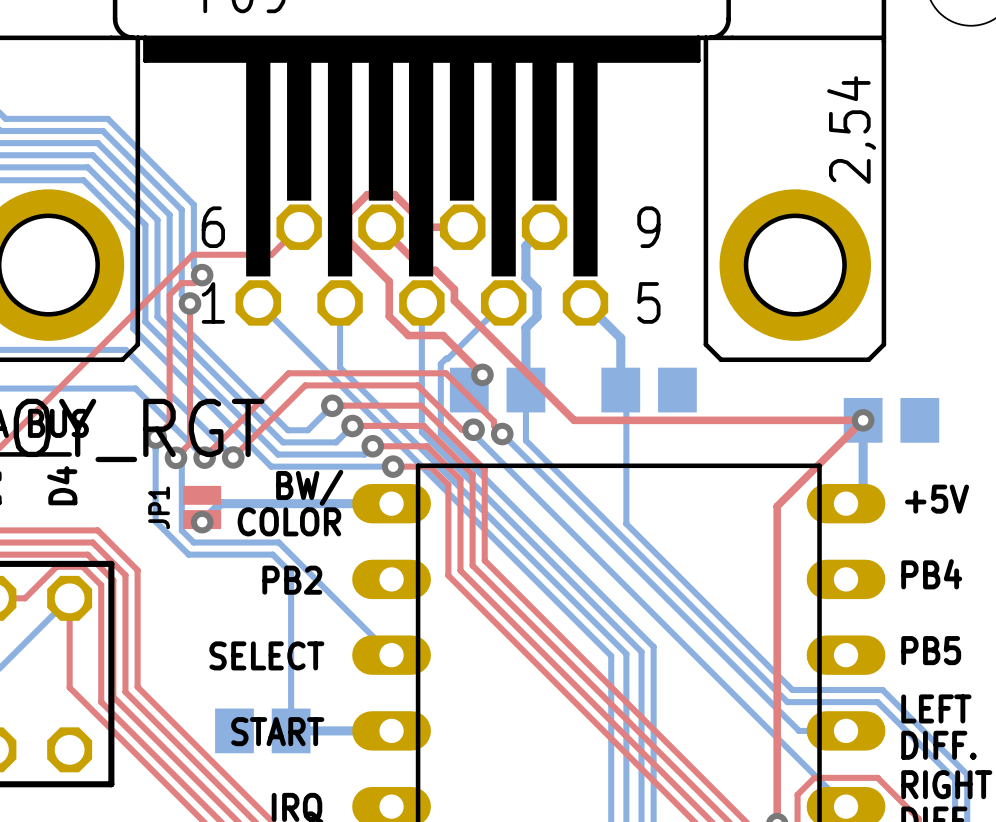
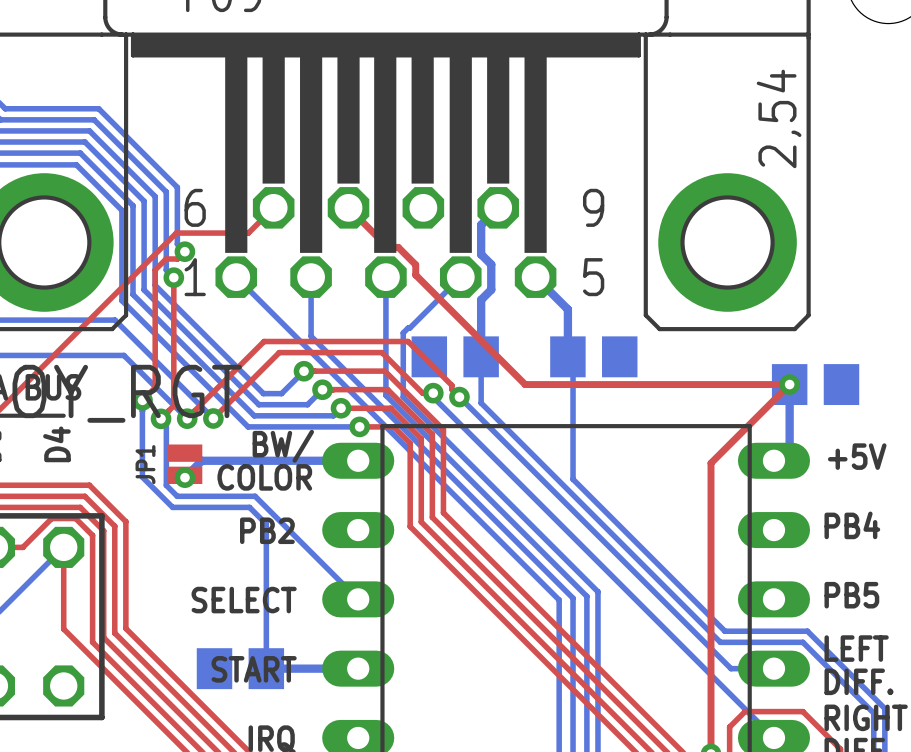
top track: (462, 227) (427, 227) (394, 194) (367, 194) (348, 213) (348, 240) (389, 281) (389, 316) (408, 335) (443, 335) (482, 374) -> none
via: (482, 374) -> none

